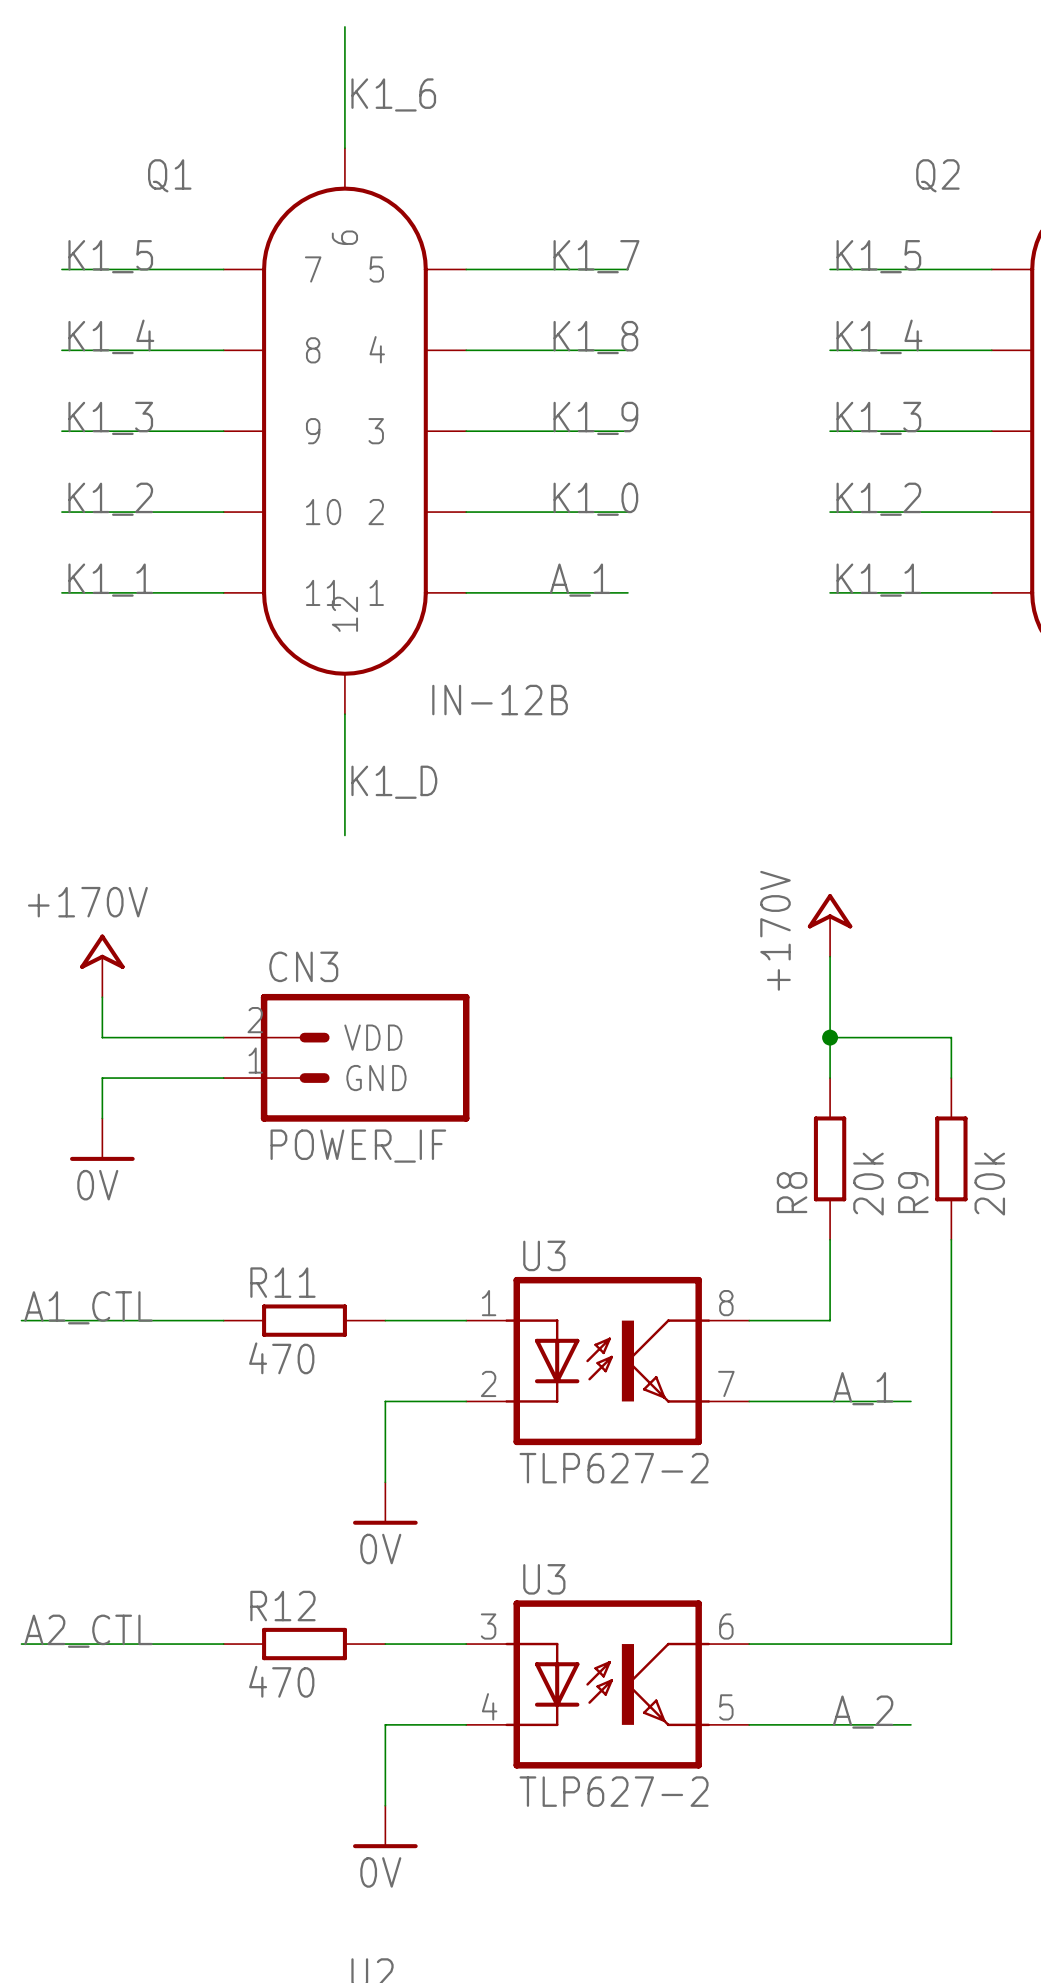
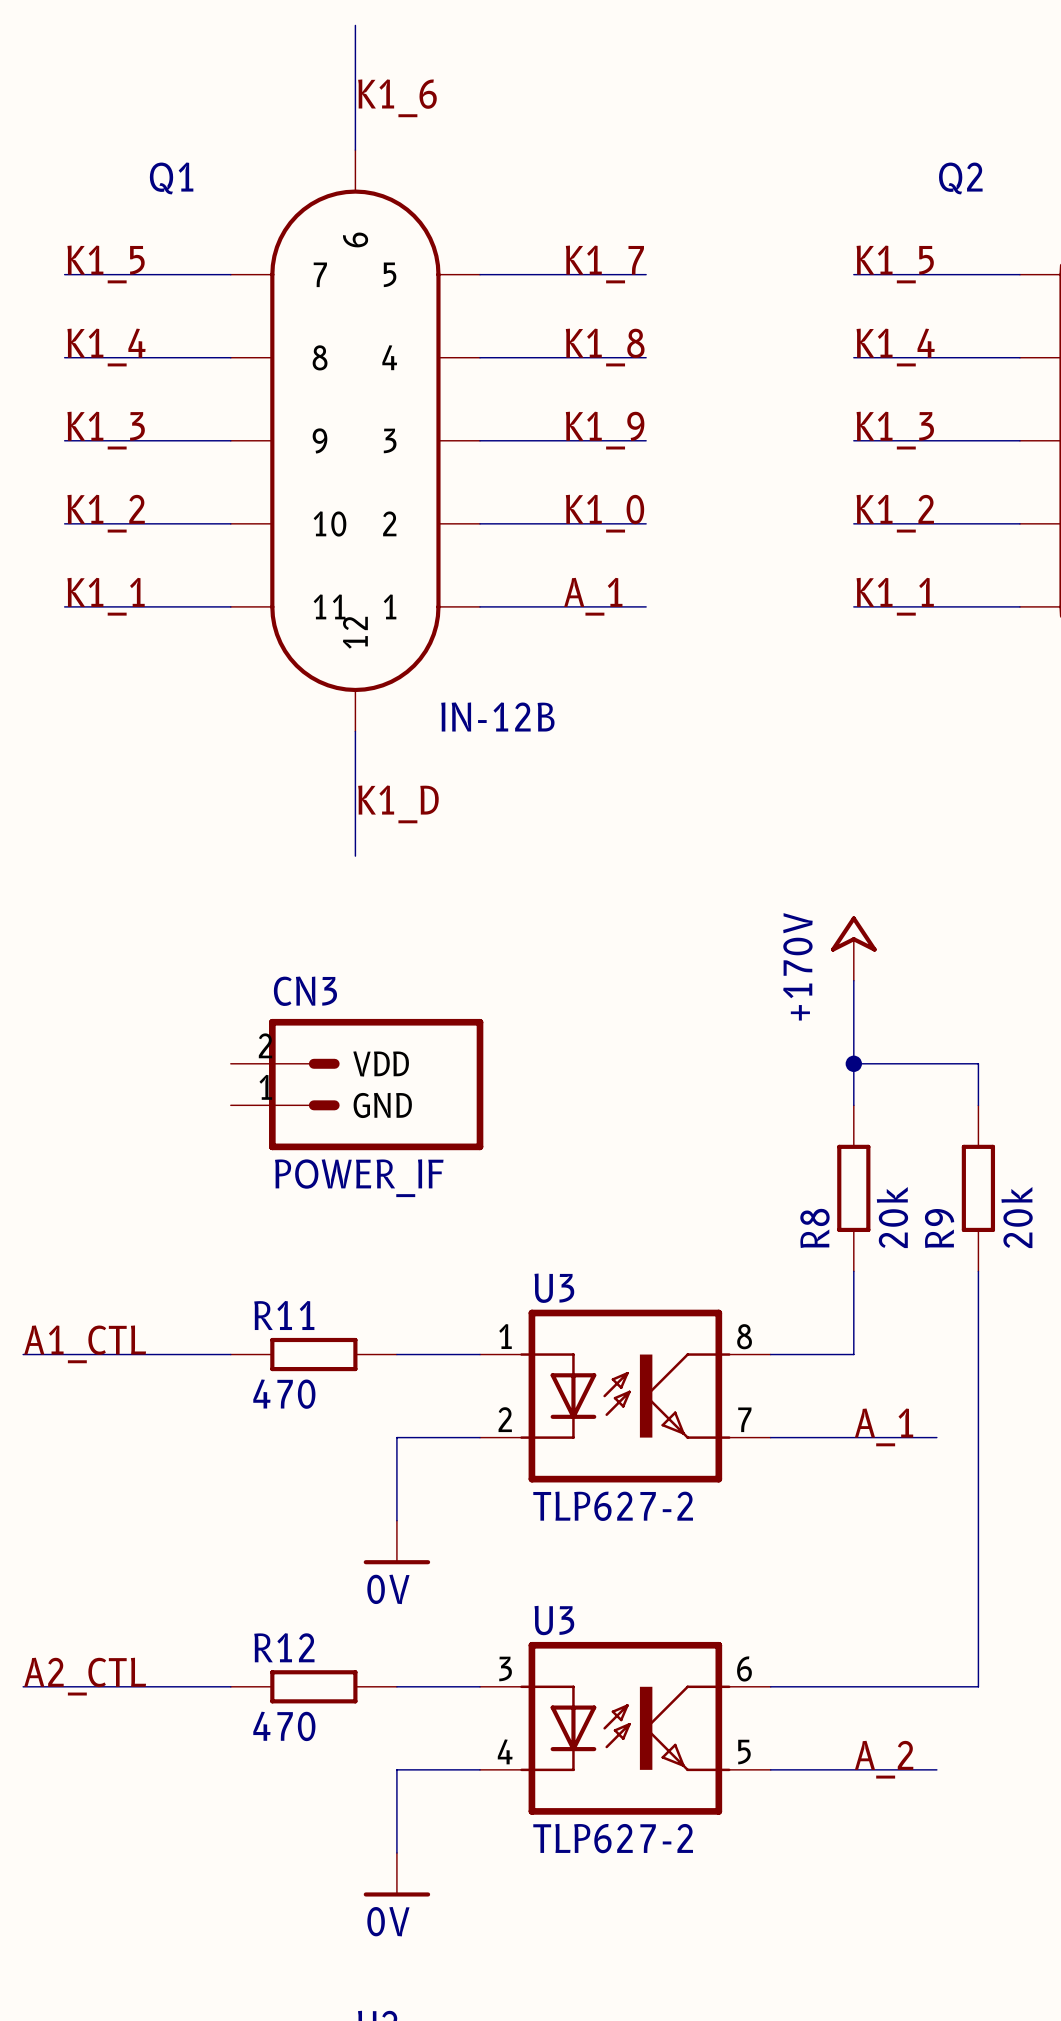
power symbol: +170V (102, 965) -> none
wire: (102, 997) (102, 1037) (223, 1037) -> none
wire: (223, 1078) (102, 1078) (102, 1118) -> none
power symbol: 0V (102, 1139) -> none

